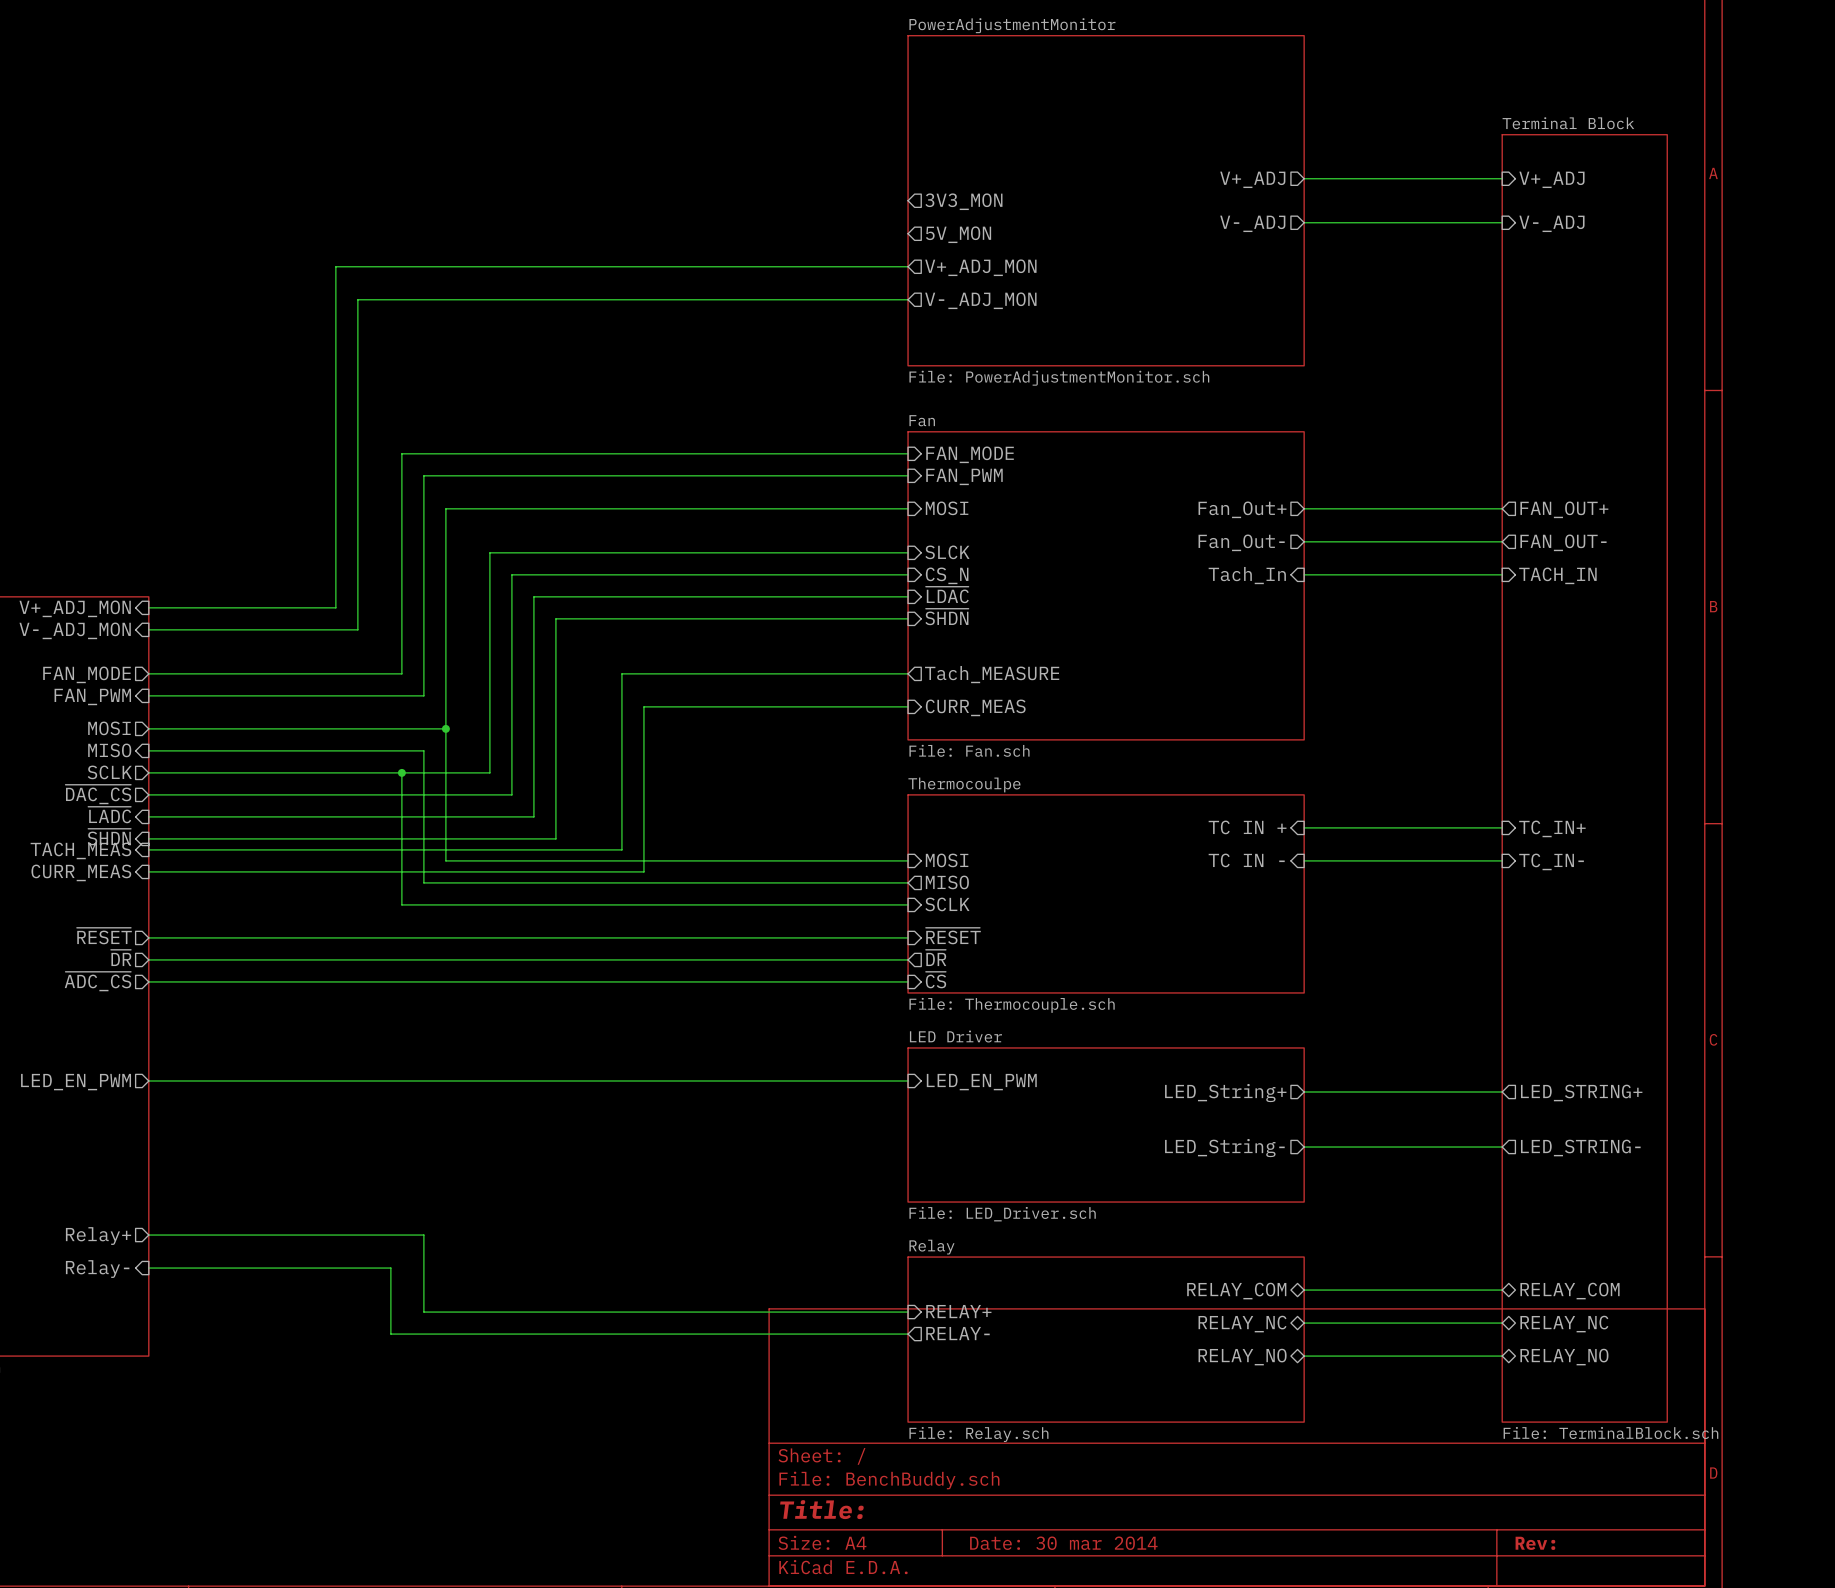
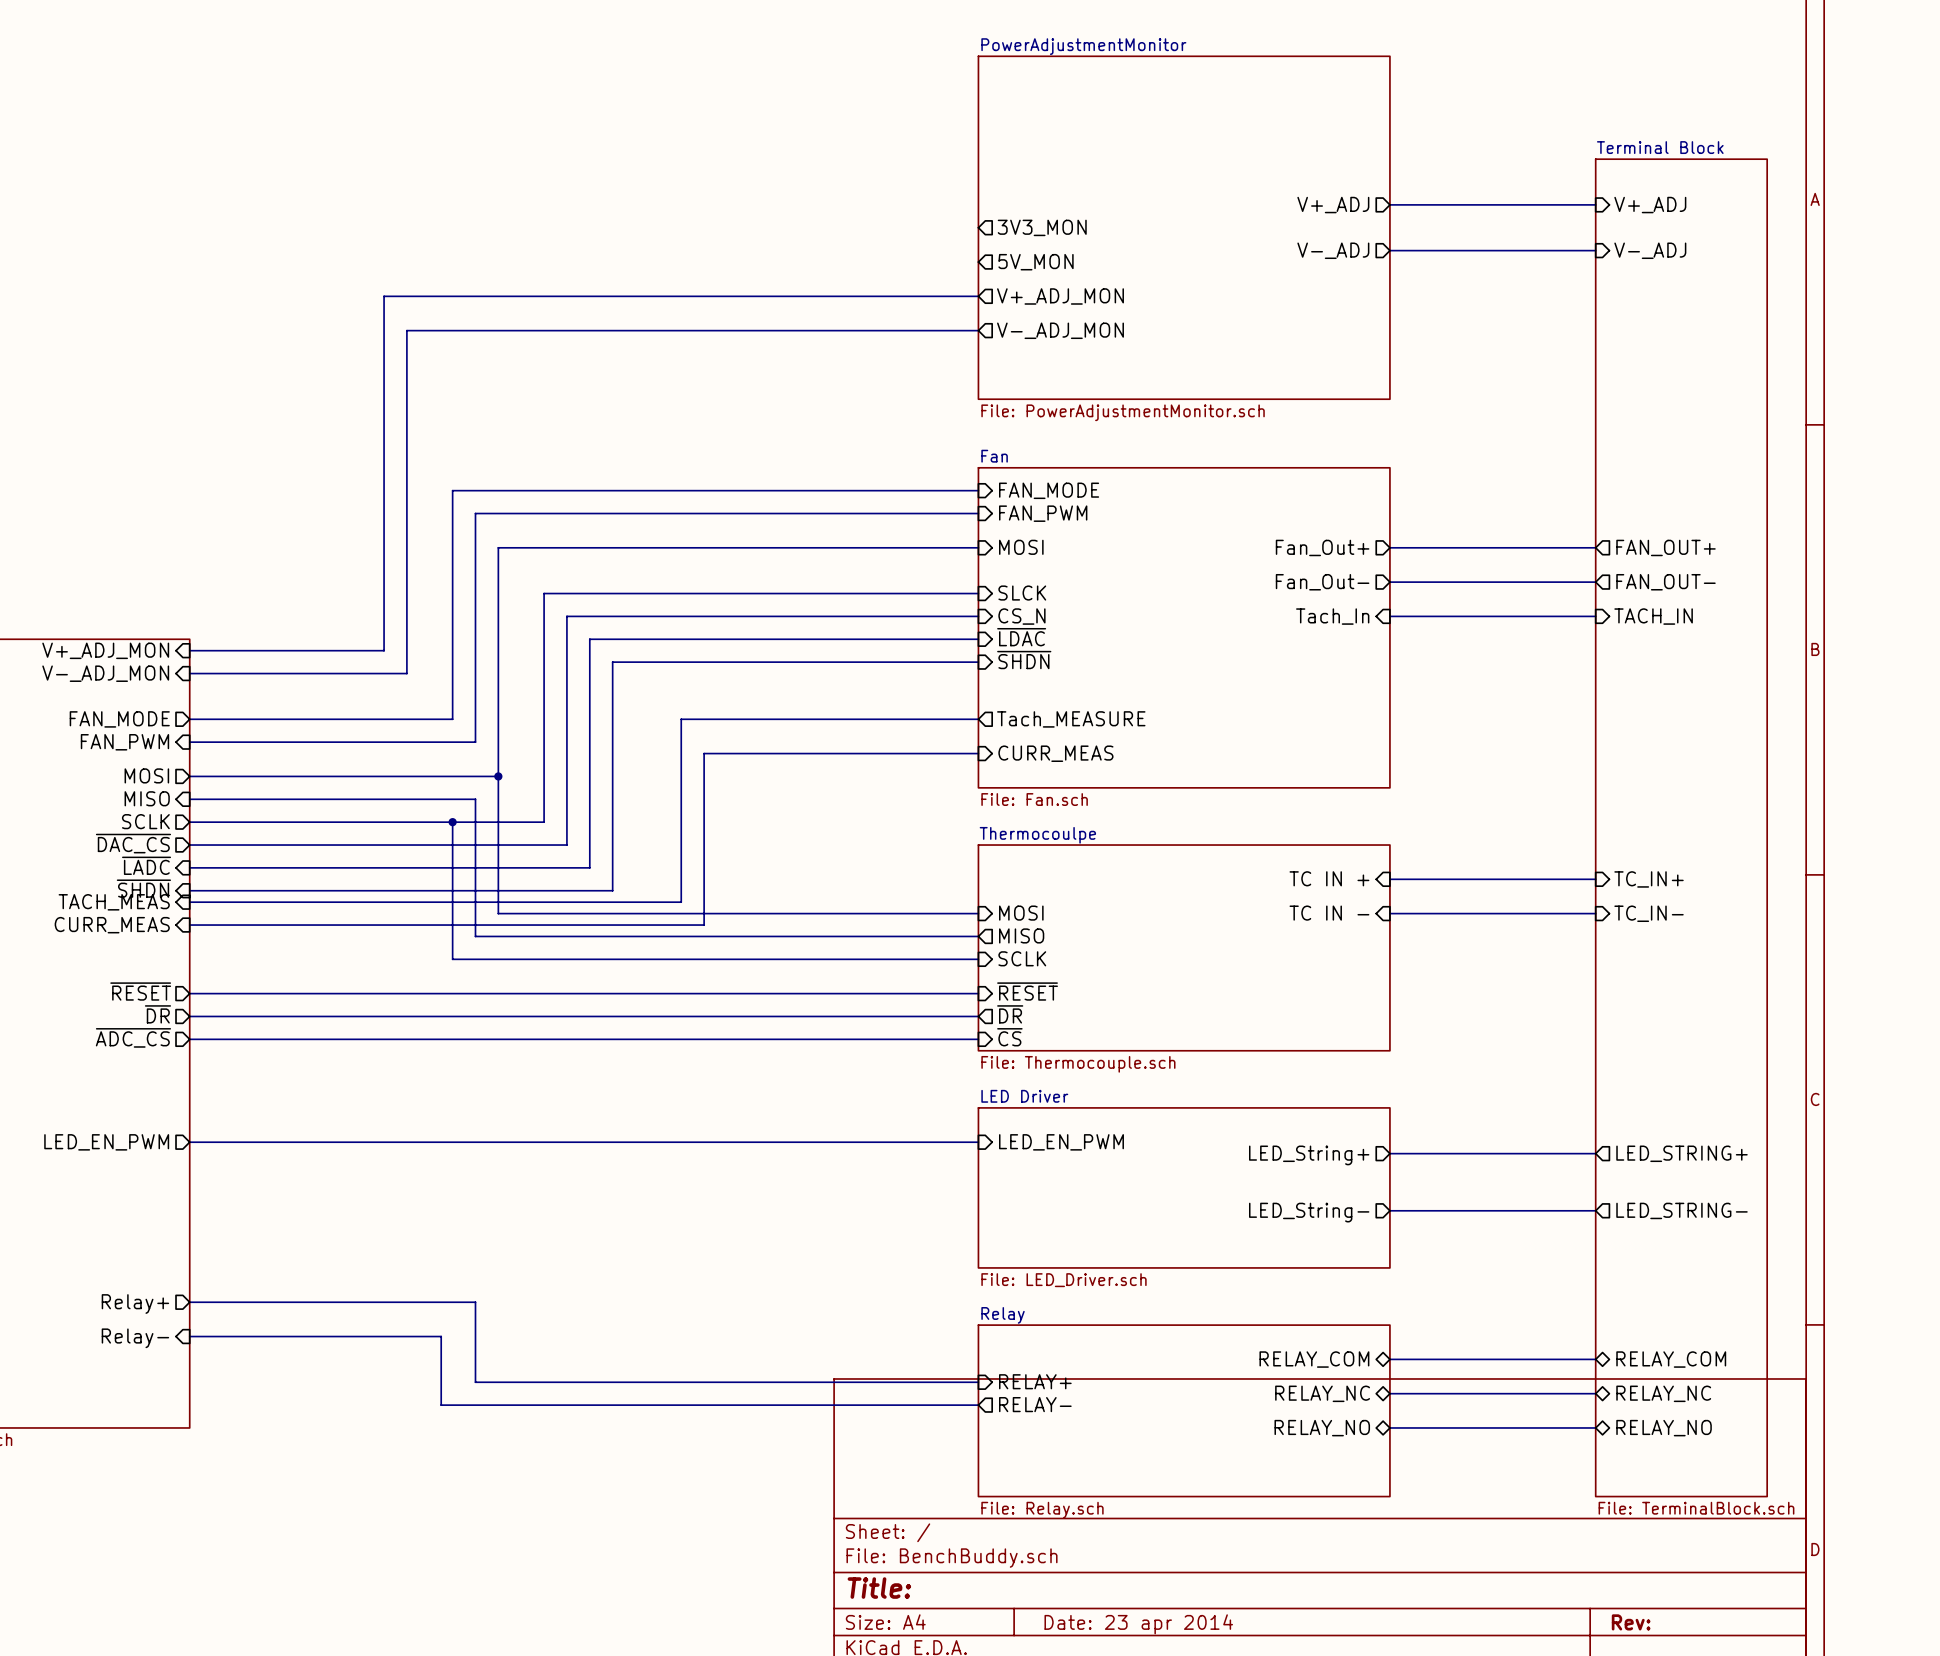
title block: Date: 30 mar 2014 (1063, 1543) -> Date: 23 apr 2014 (1138, 1624)

